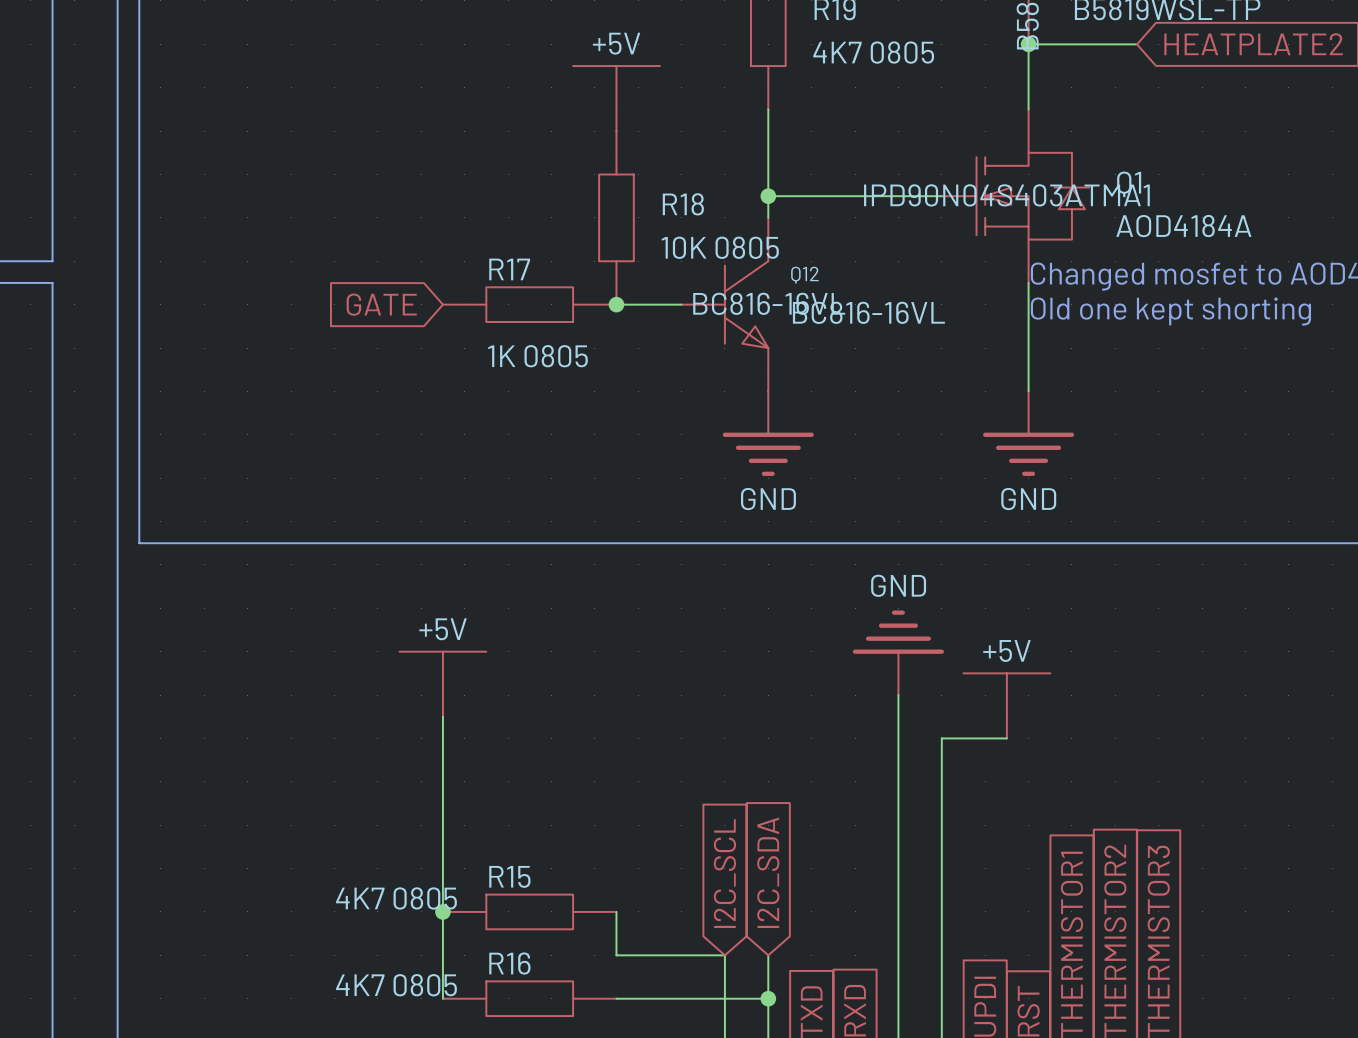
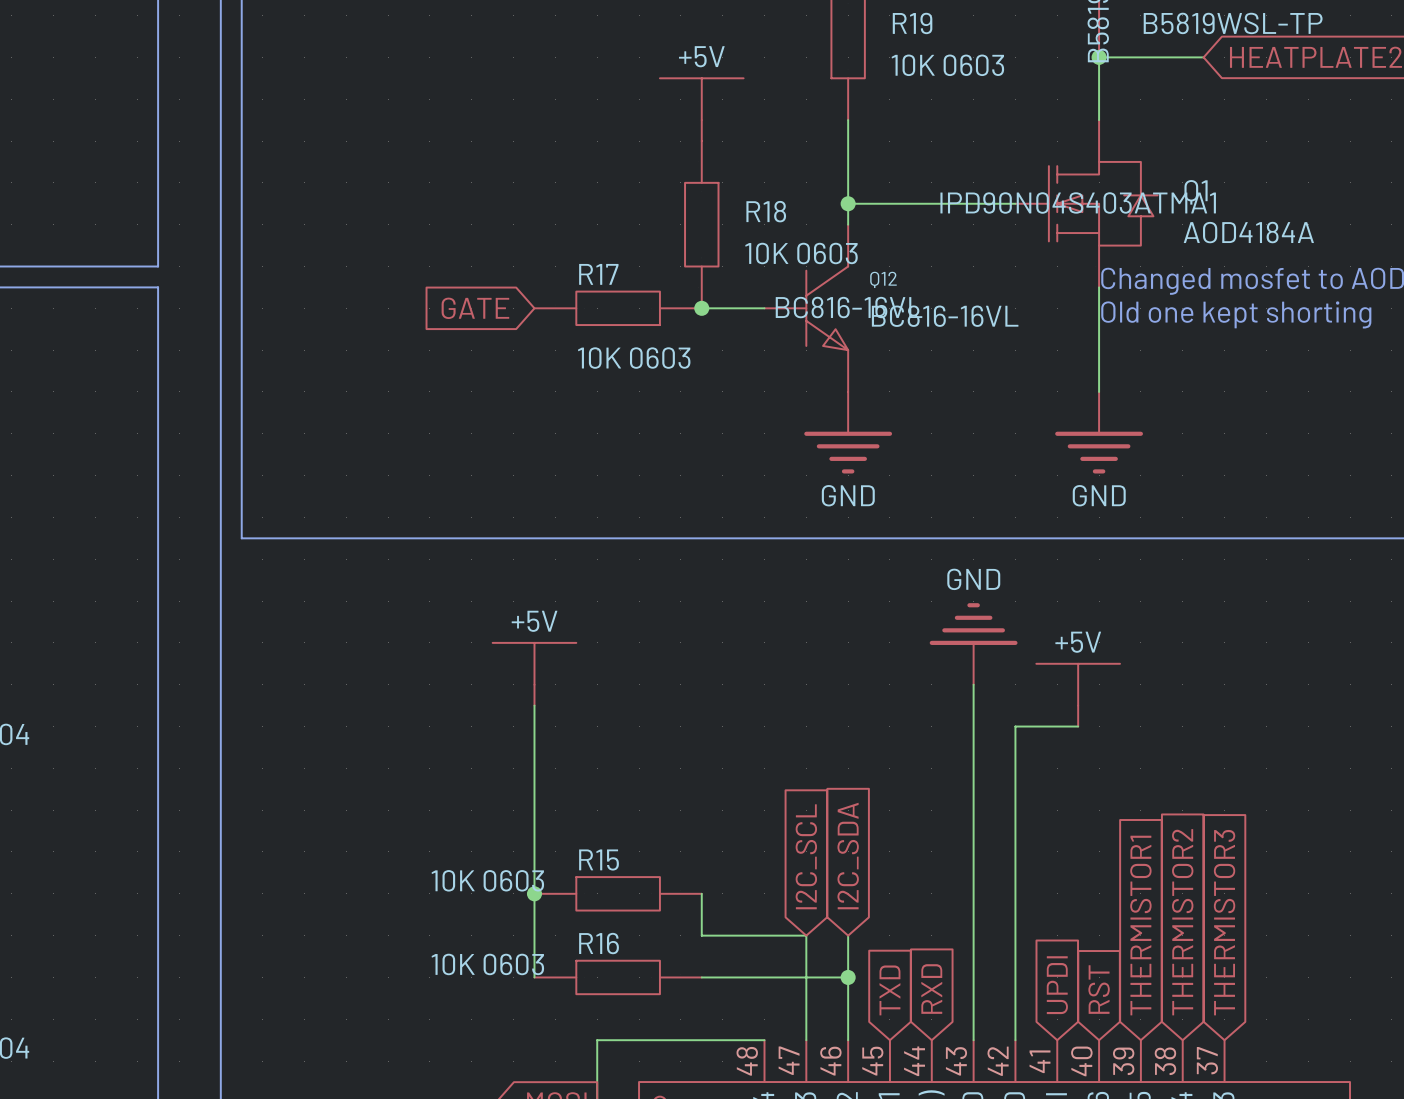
R19 value: 4K7 0805 (873, 52) -> 10K 0603 (947, 65)
R18 value: 10K 0805 (720, 247) -> 10K 0603 (801, 253)
R17 value: 1K 0805 (537, 356) -> 10K 0603 (634, 358)
R15 value: 4K7 0805 (396, 898) -> 10K 0603 (487, 880)
R16 value: 4K7 0805 (396, 985) -> 10K 0603 (487, 964)

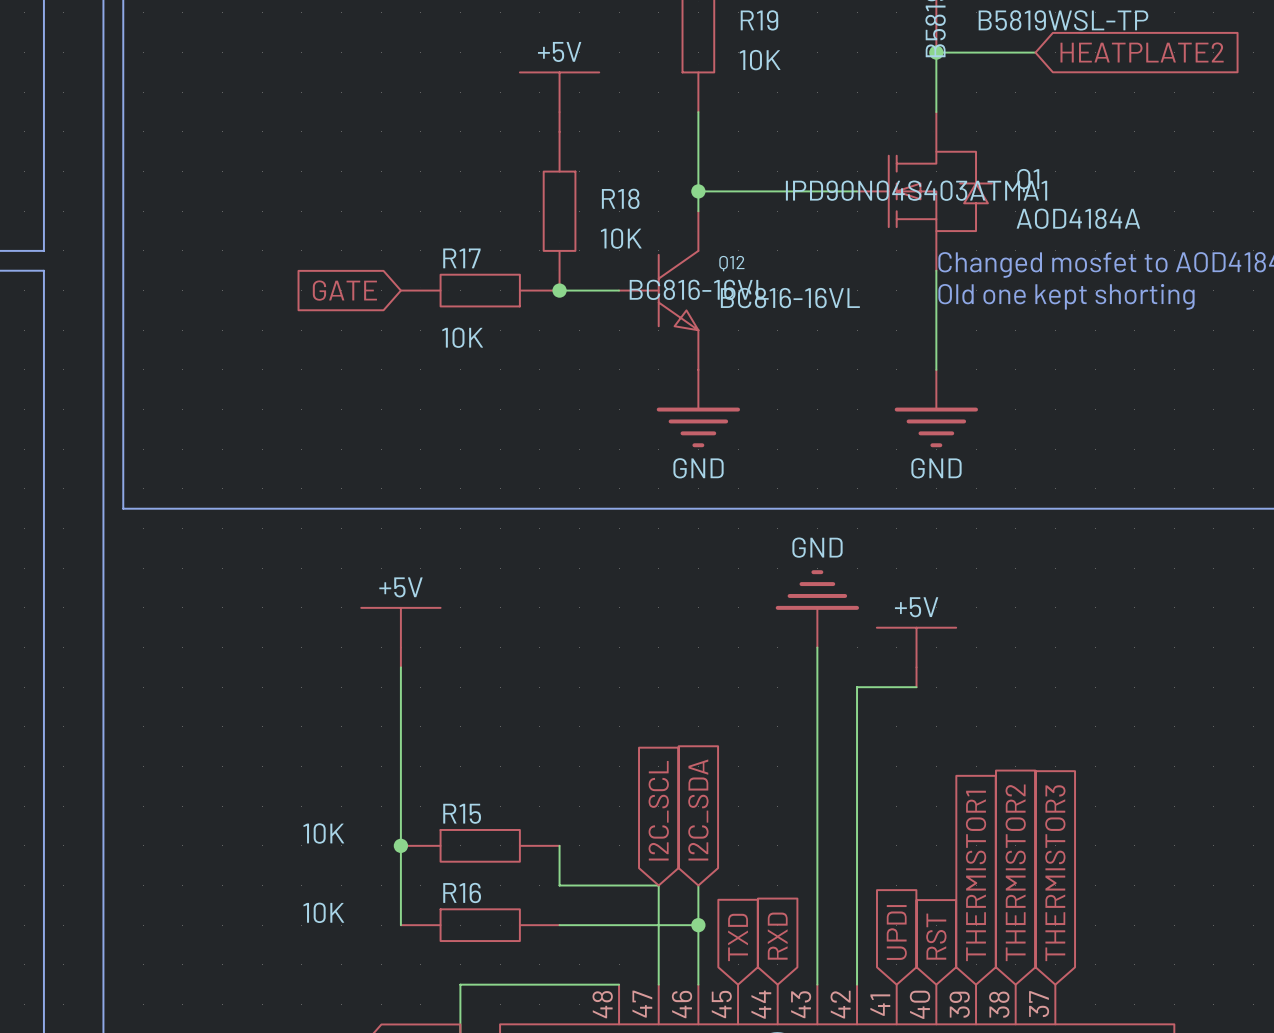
R19 value: 10K 0603 (947, 65) -> 10K (760, 60)
R18 value: 10K 0603 (801, 253) -> 10K (621, 238)
R17 value: 10K 0603 (634, 358) -> 10K (462, 337)
R15 value: 10K 0603 (487, 880) -> 10K (323, 833)
R16 value: 10K 0603 (487, 964) -> 10K (323, 912)

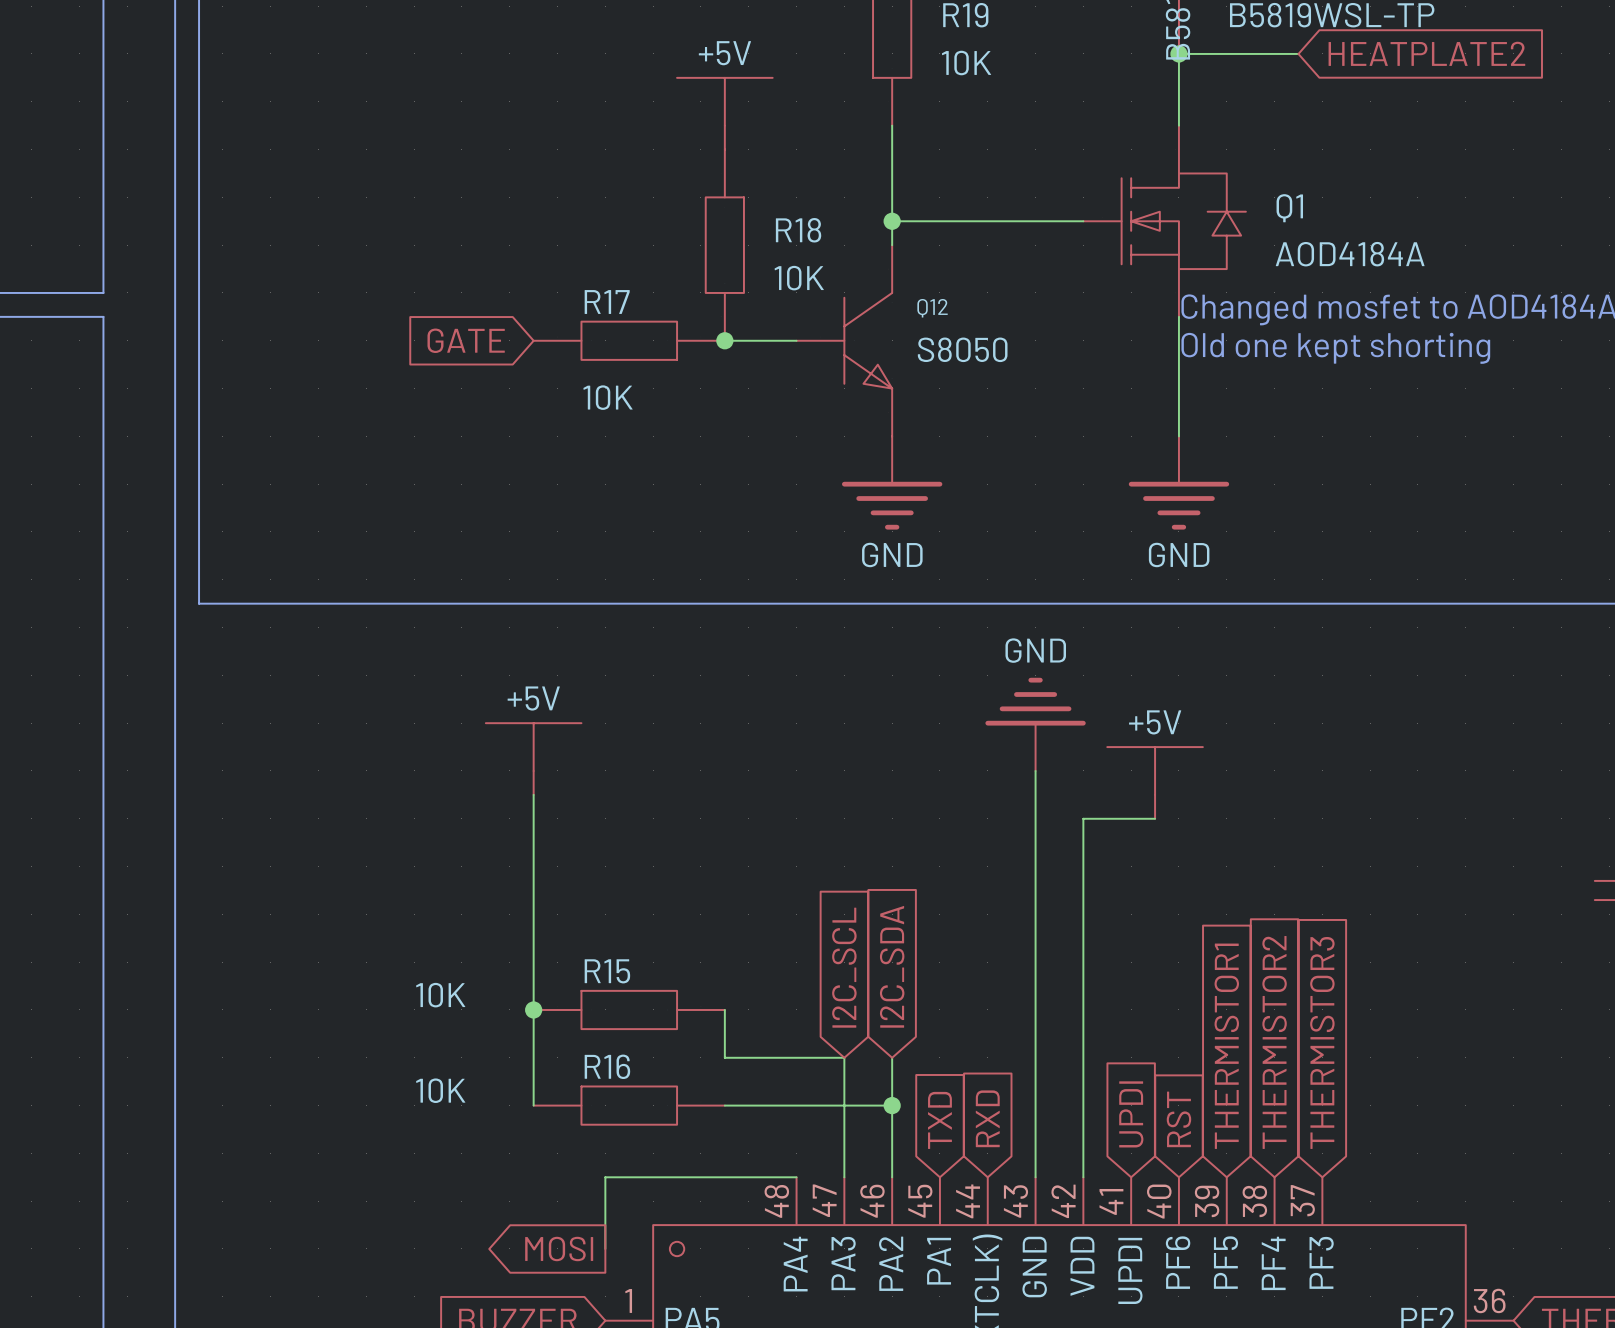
Q1 text: IPD90N04S403ATMA1 (916, 190) -> none
Q12 text: BC816-16VL (699, 289) -> none
Q12 value: BC816-16VL (790, 298) -> S8050 (962, 349)

